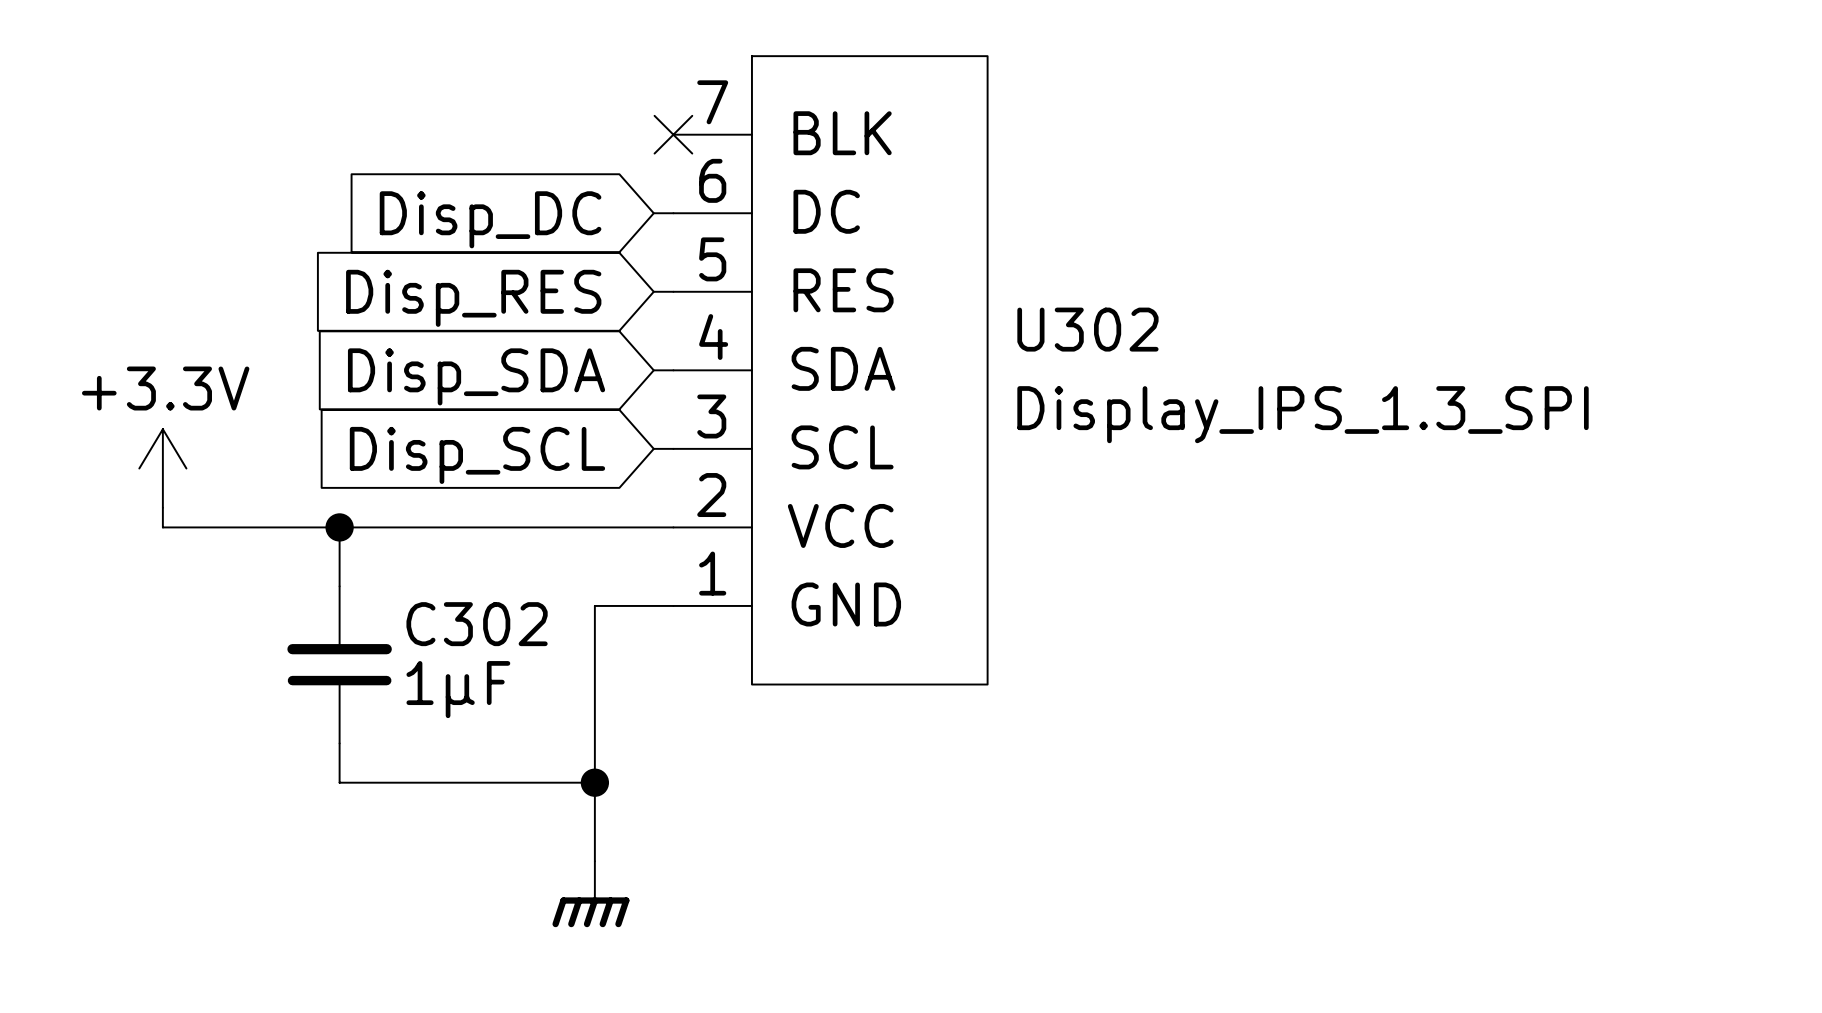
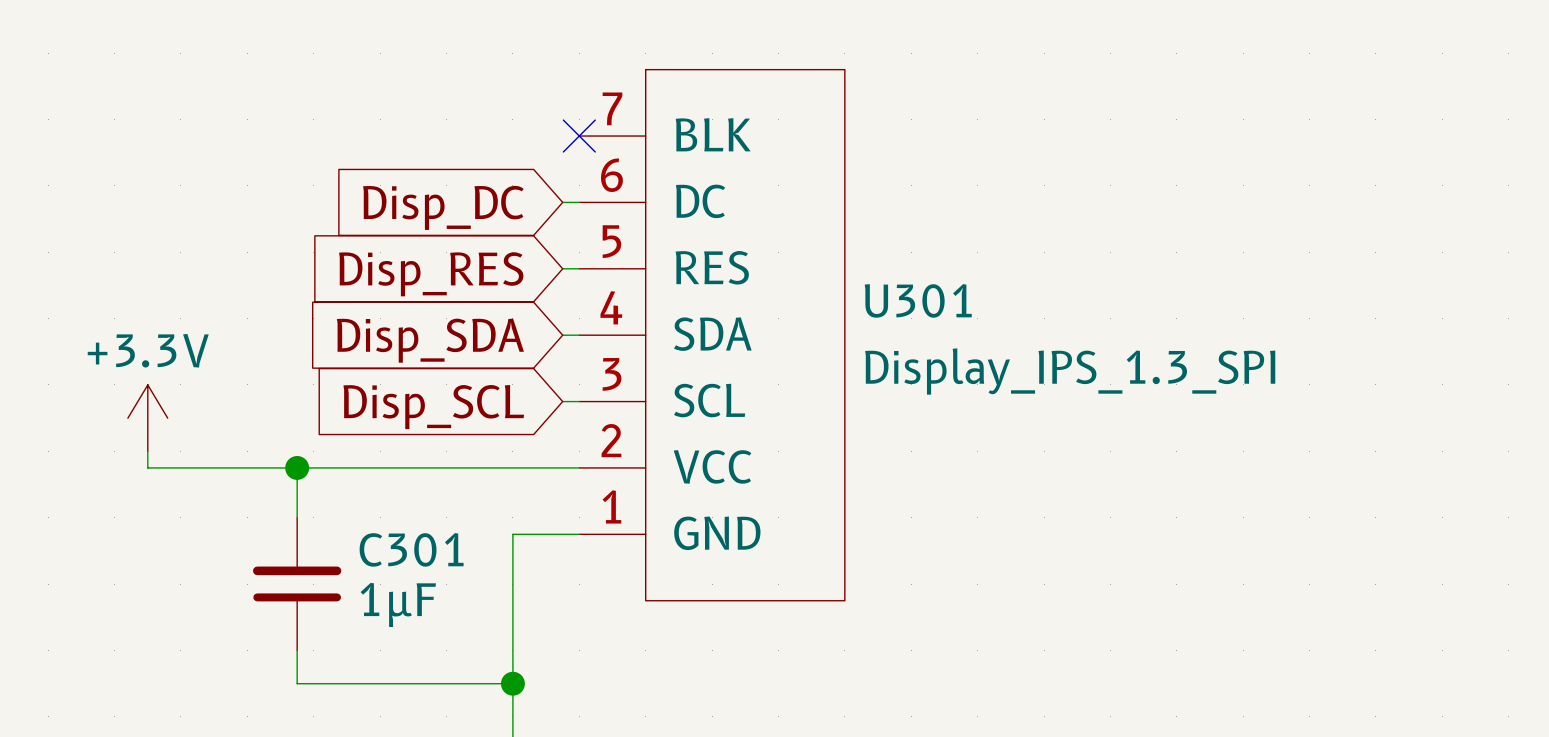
U302 name: U302 (1087, 329) -> U301 (918, 300)
C302 name: C302 (477, 624) -> C301 (411, 549)

